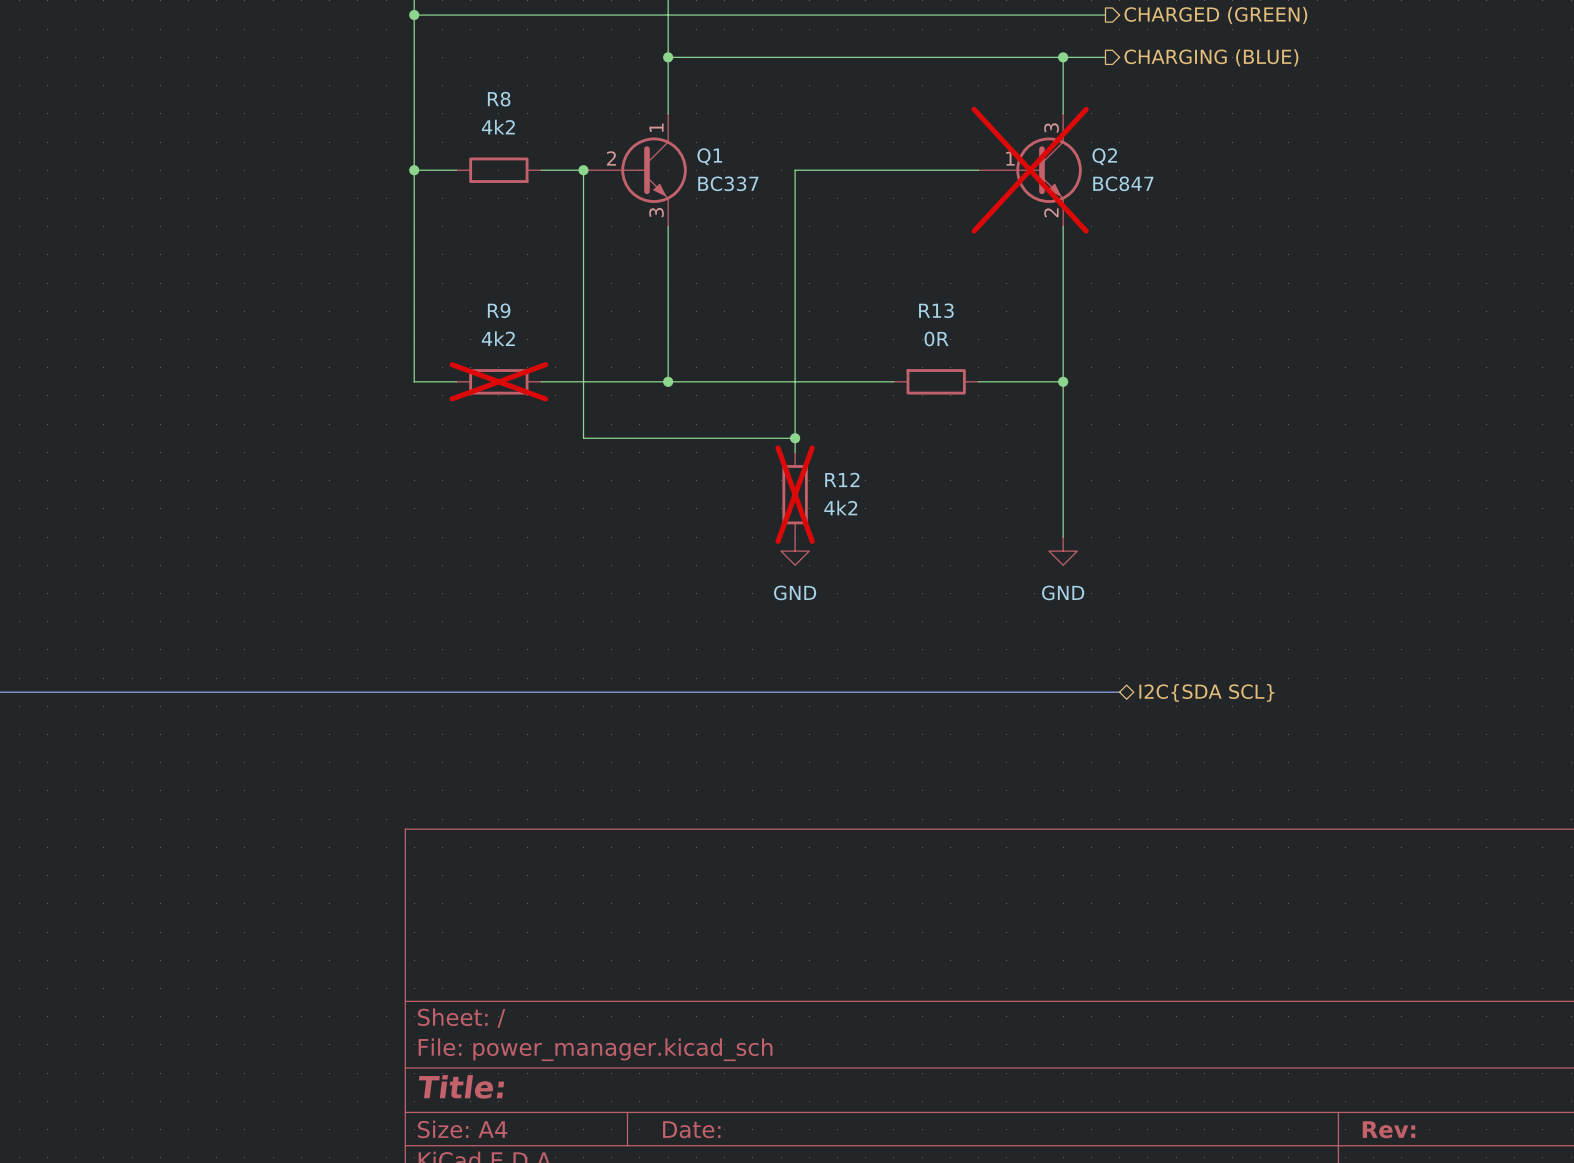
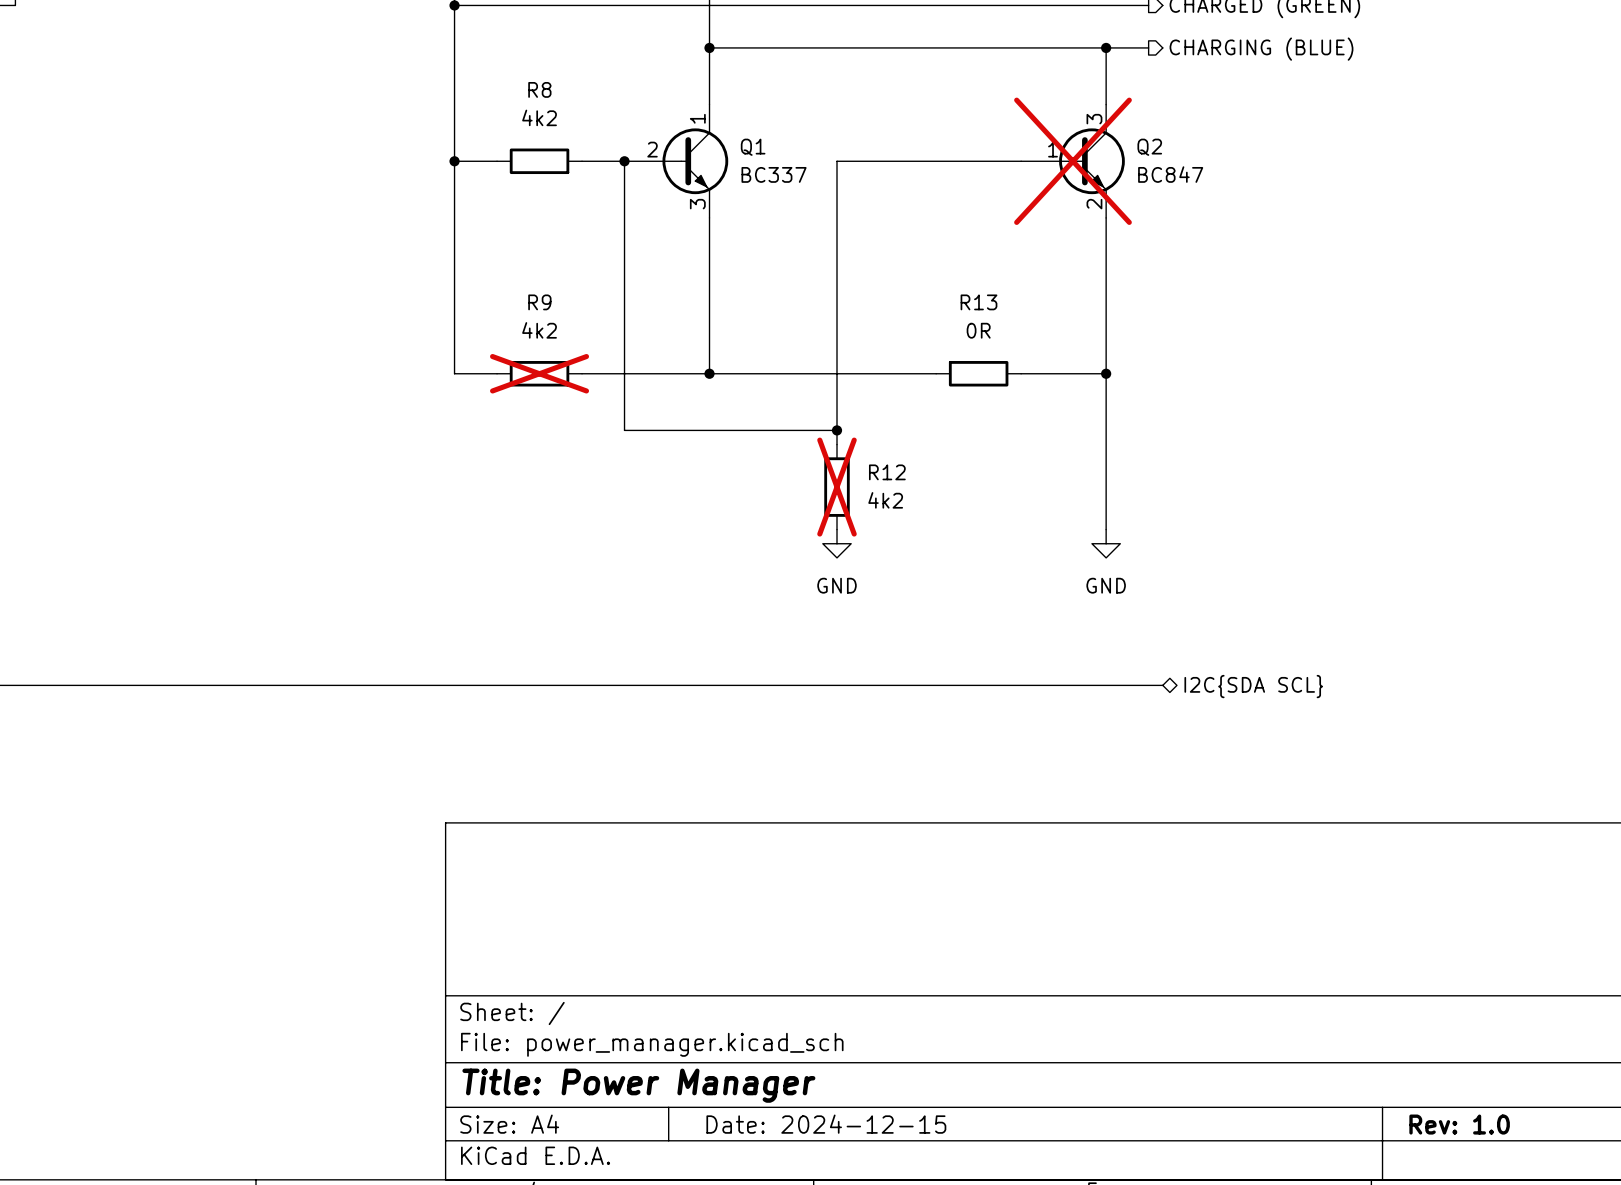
title block: Title: (461, 1086) -> Title: Power Manager (638, 1085)
title block: Date: (691, 1129) -> Date: 2024-12-15 (826, 1124)
title block: Rev: (1388, 1129) -> Rev: 1.0 (1459, 1124)

